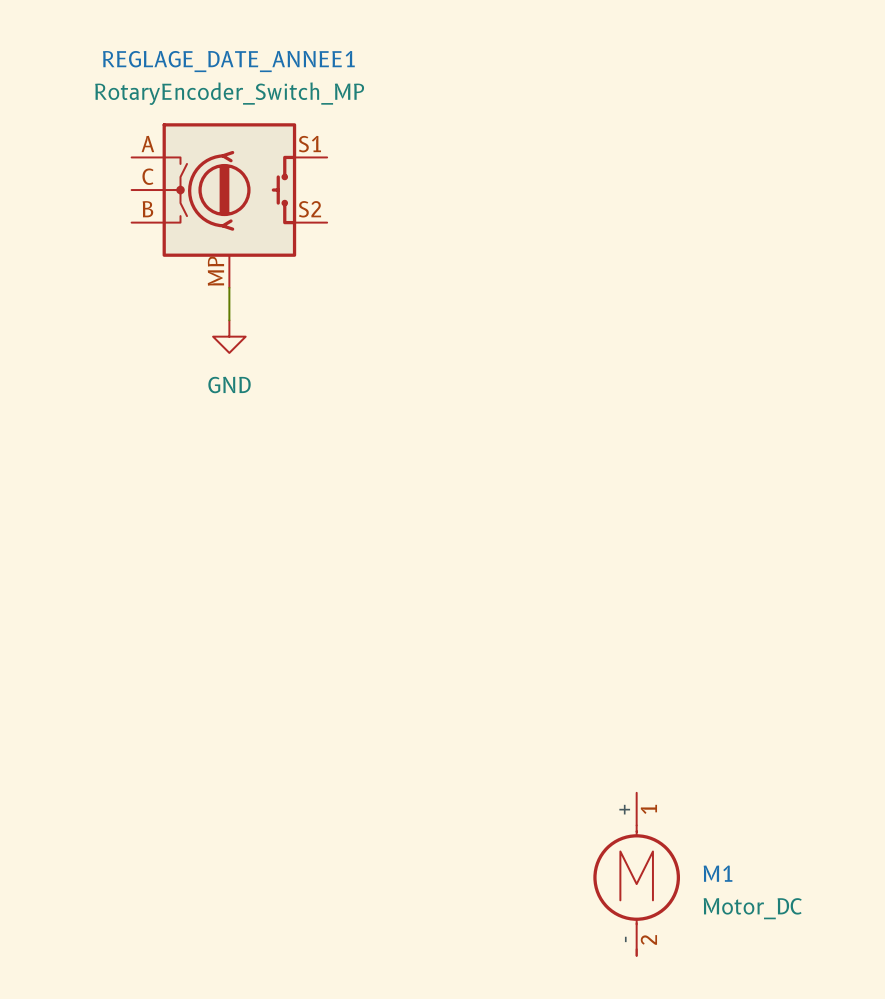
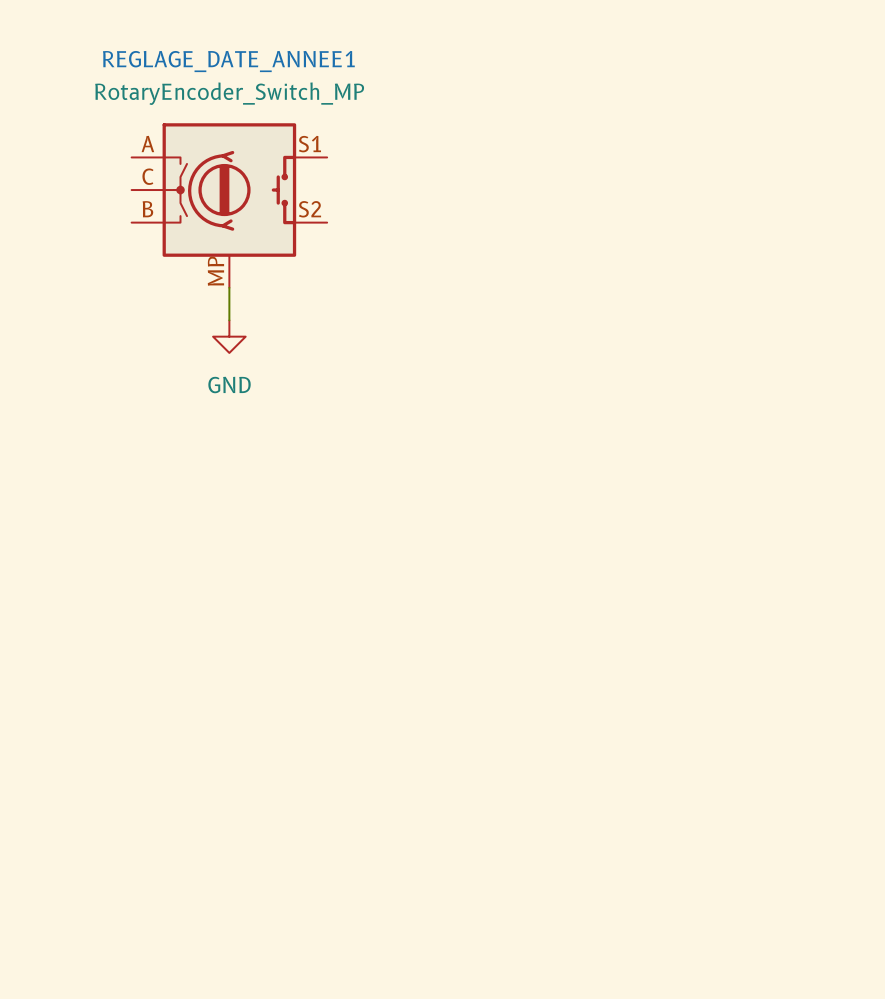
M1: Motor_DC (636, 874) -> none

